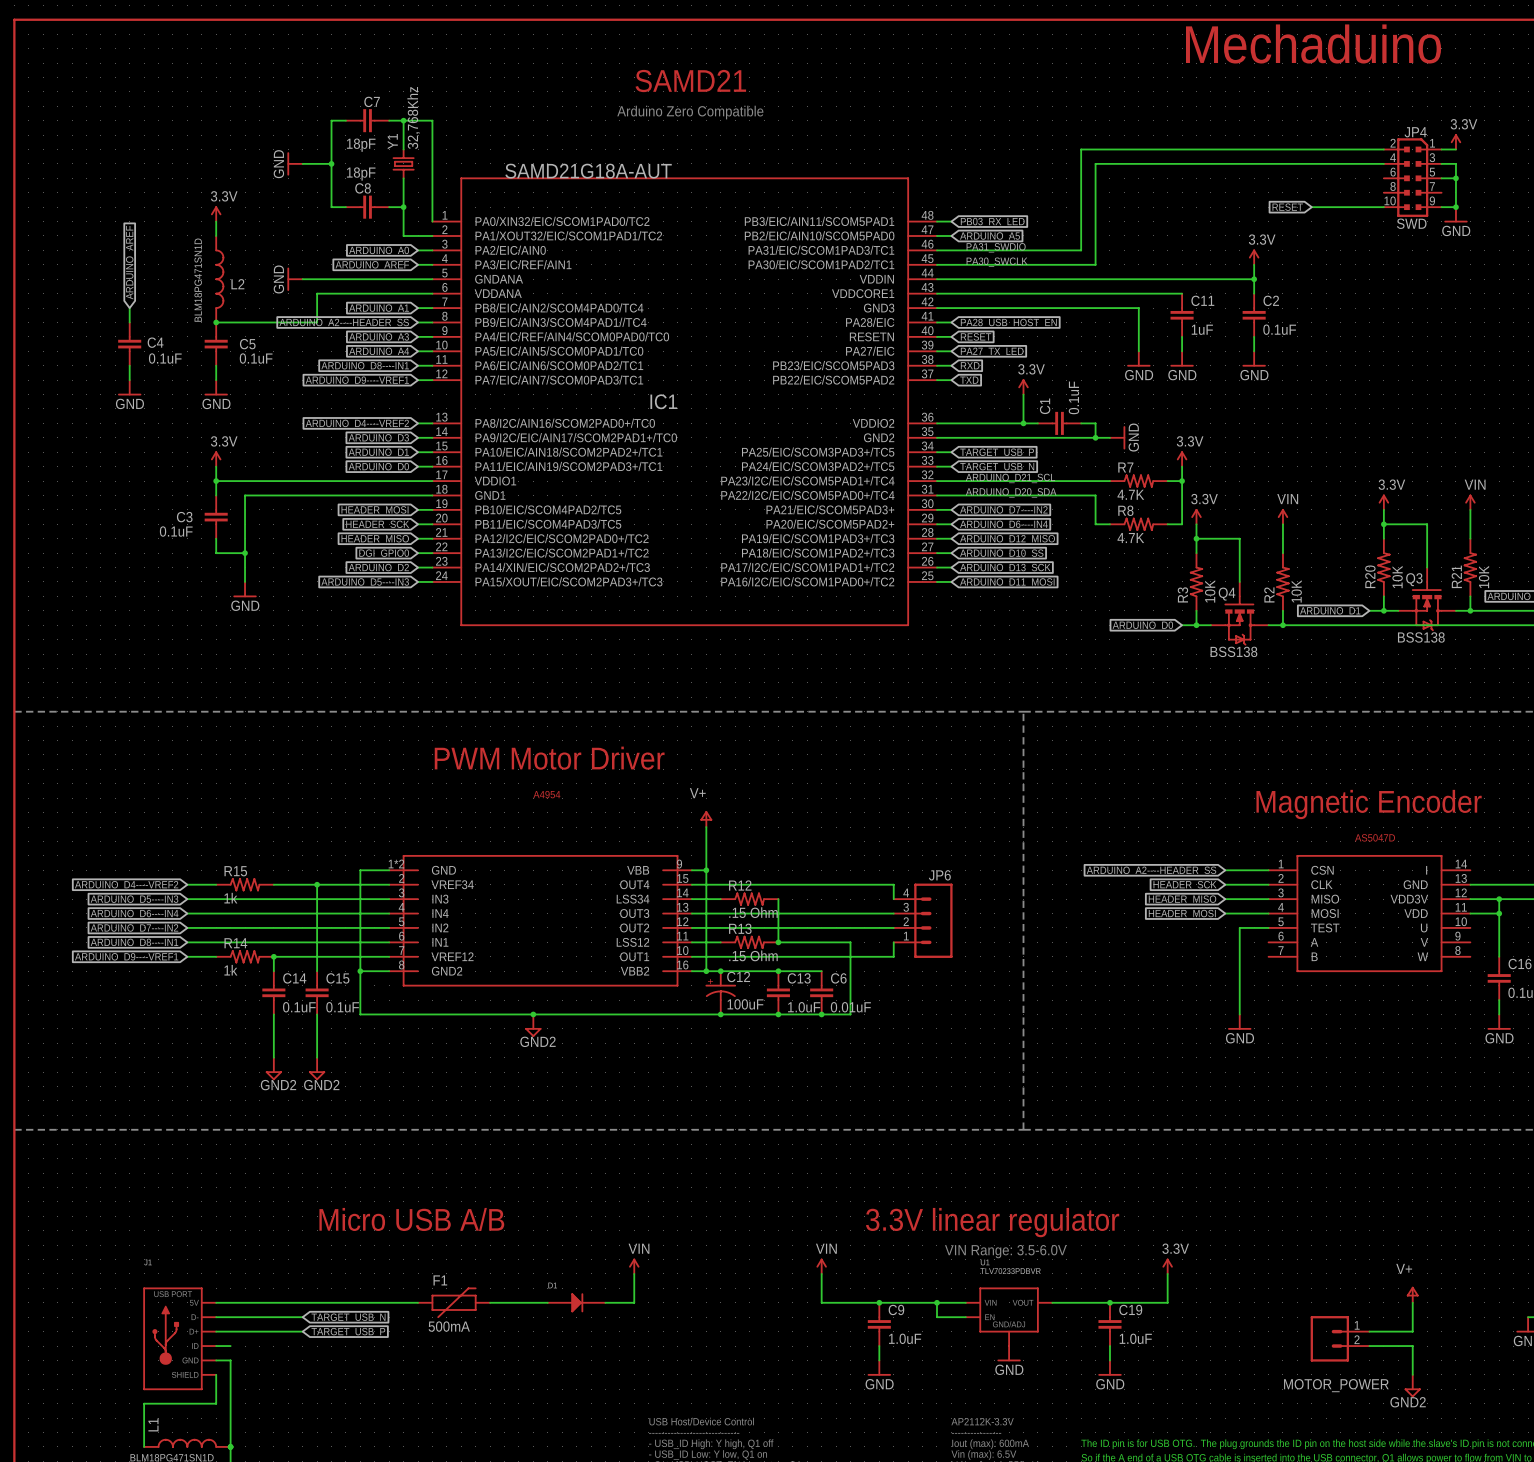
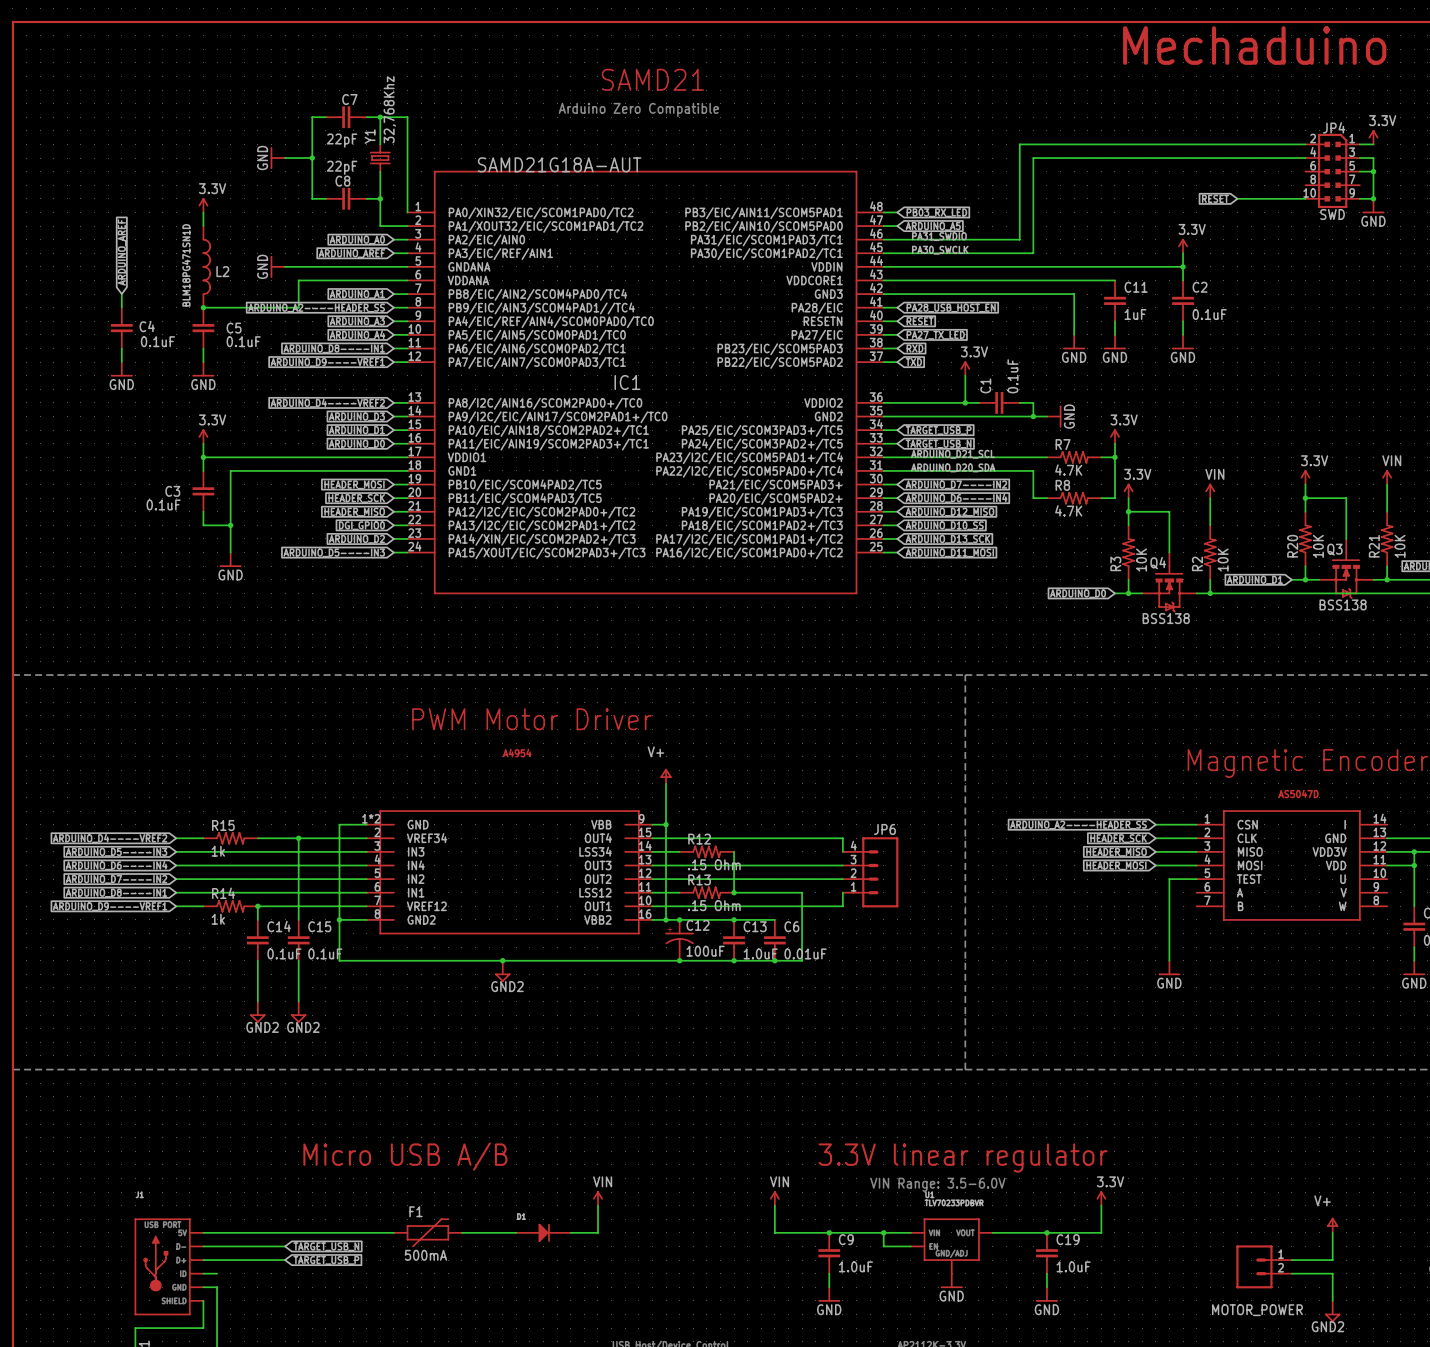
C7 value: 18pF (361, 145) -> 22pF (342, 140)
C8 value: 18pF (361, 174) -> 22pF (342, 167)

